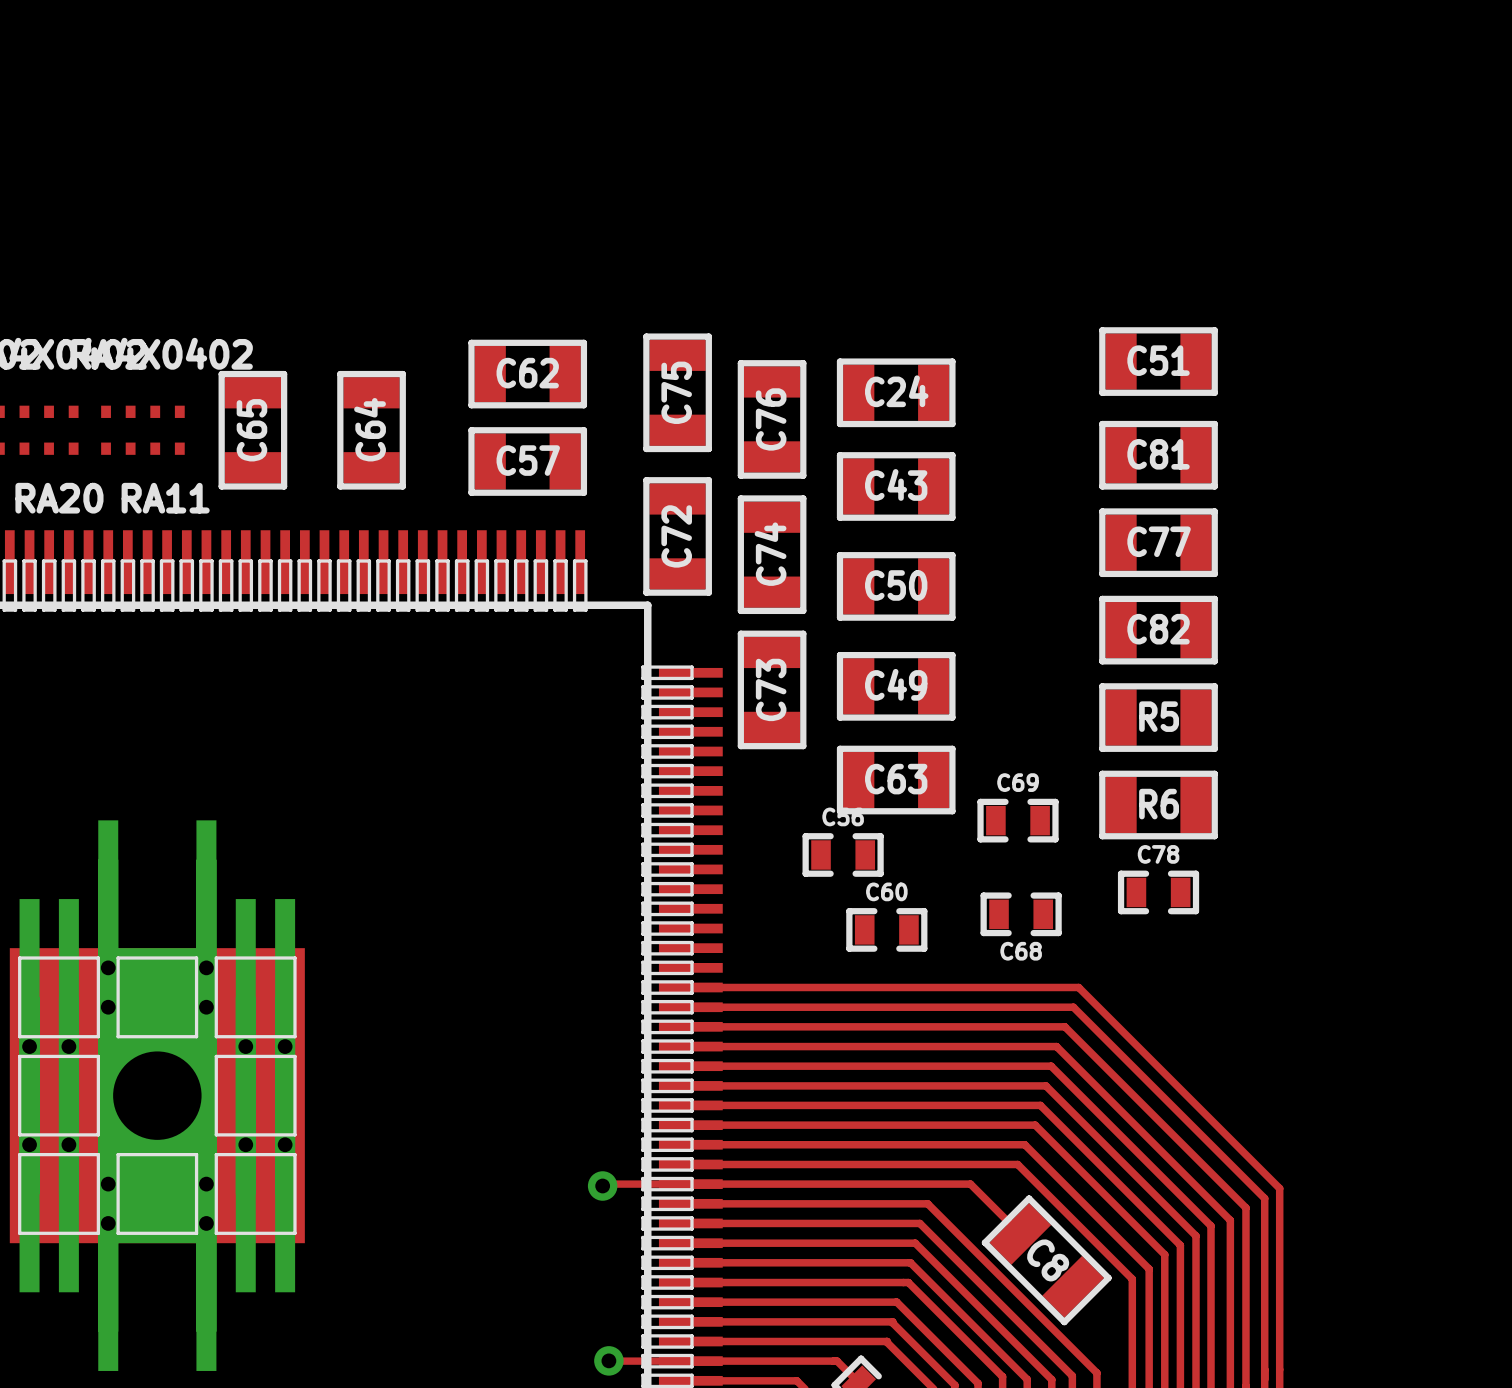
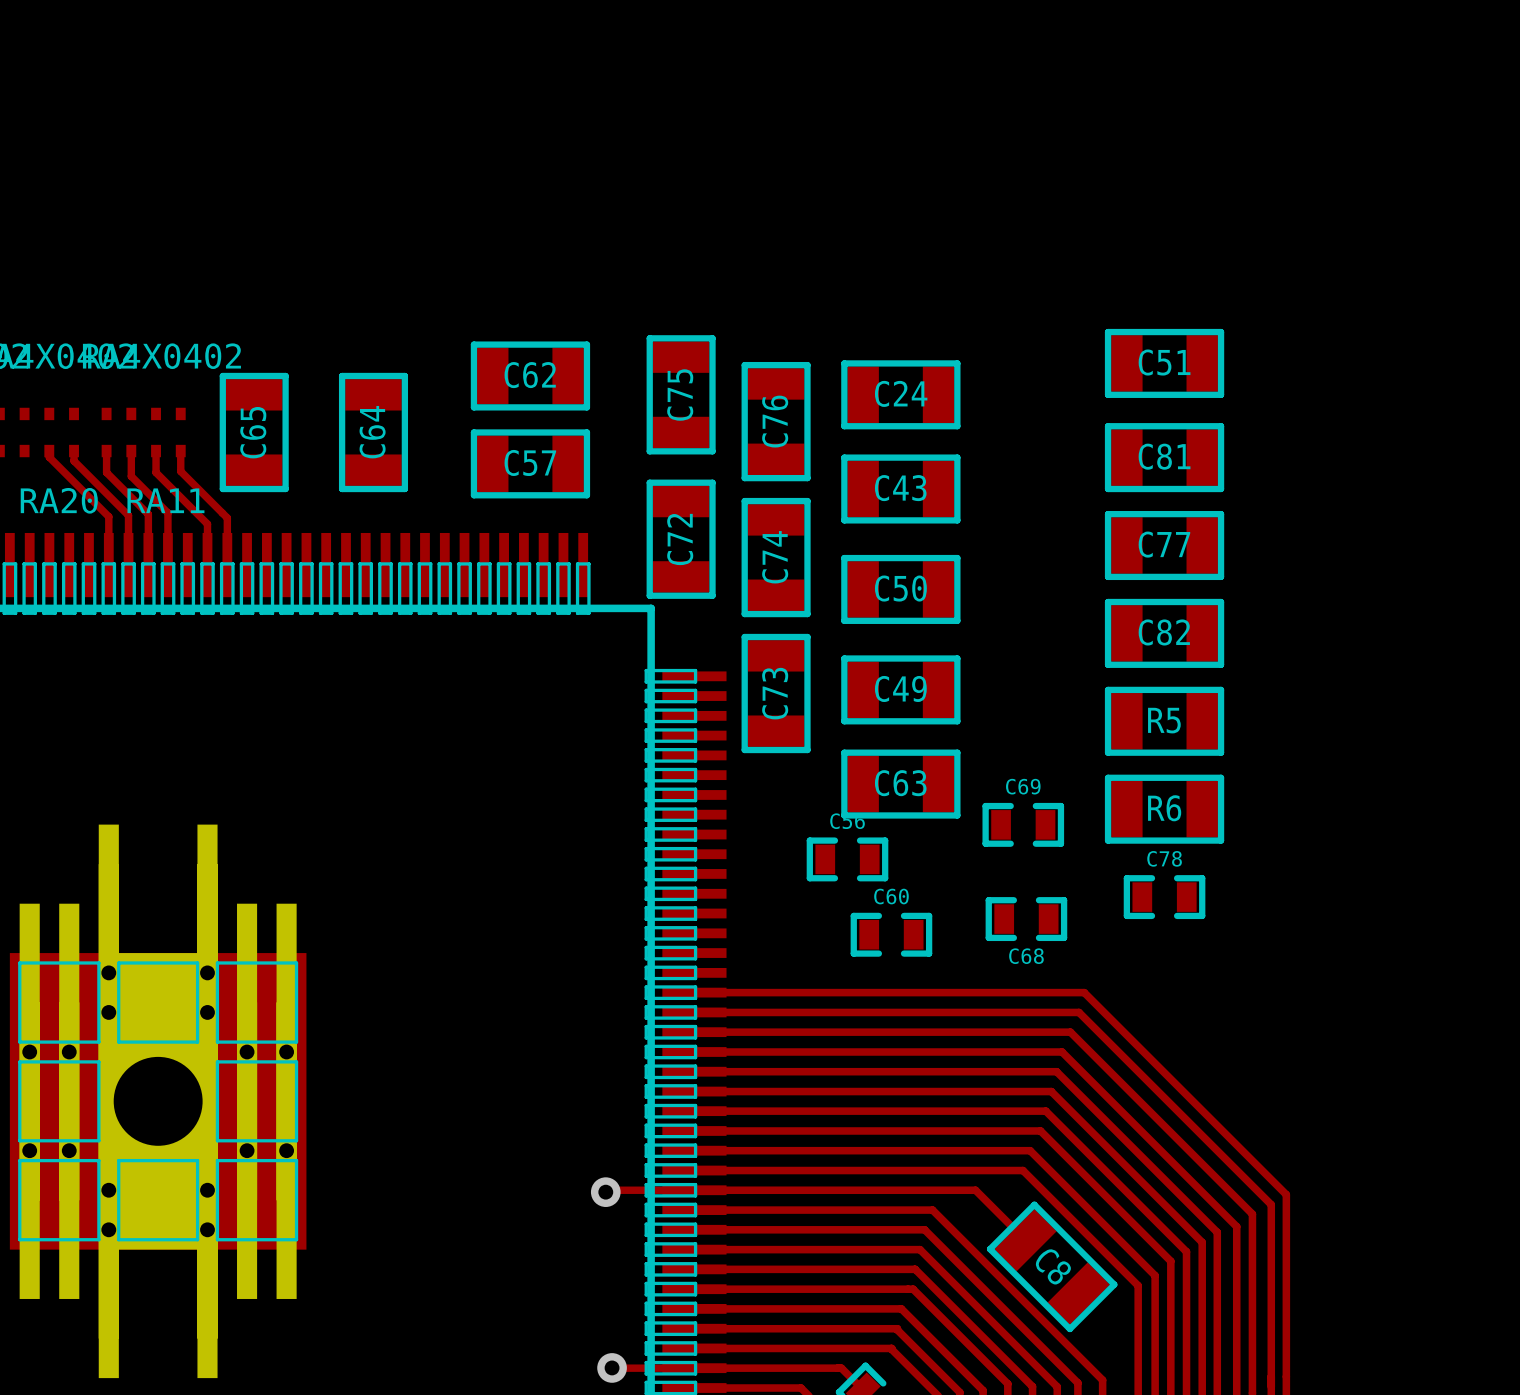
top track: none -> (49, 451) (49, 457) (108, 516) (108, 565)
top track: none -> (74, 451) (74, 460) (128, 515) (128, 565)
top track: none -> (106, 451) (106, 472) (148, 514) (148, 565)
top track: none -> (131, 451) (131, 476) (167, 512) (167, 565)
top track: none -> (156, 451) (156, 472) (207, 524) (207, 565)
top track: none -> (180, 451) (180, 471) (227, 517) (227, 565)

